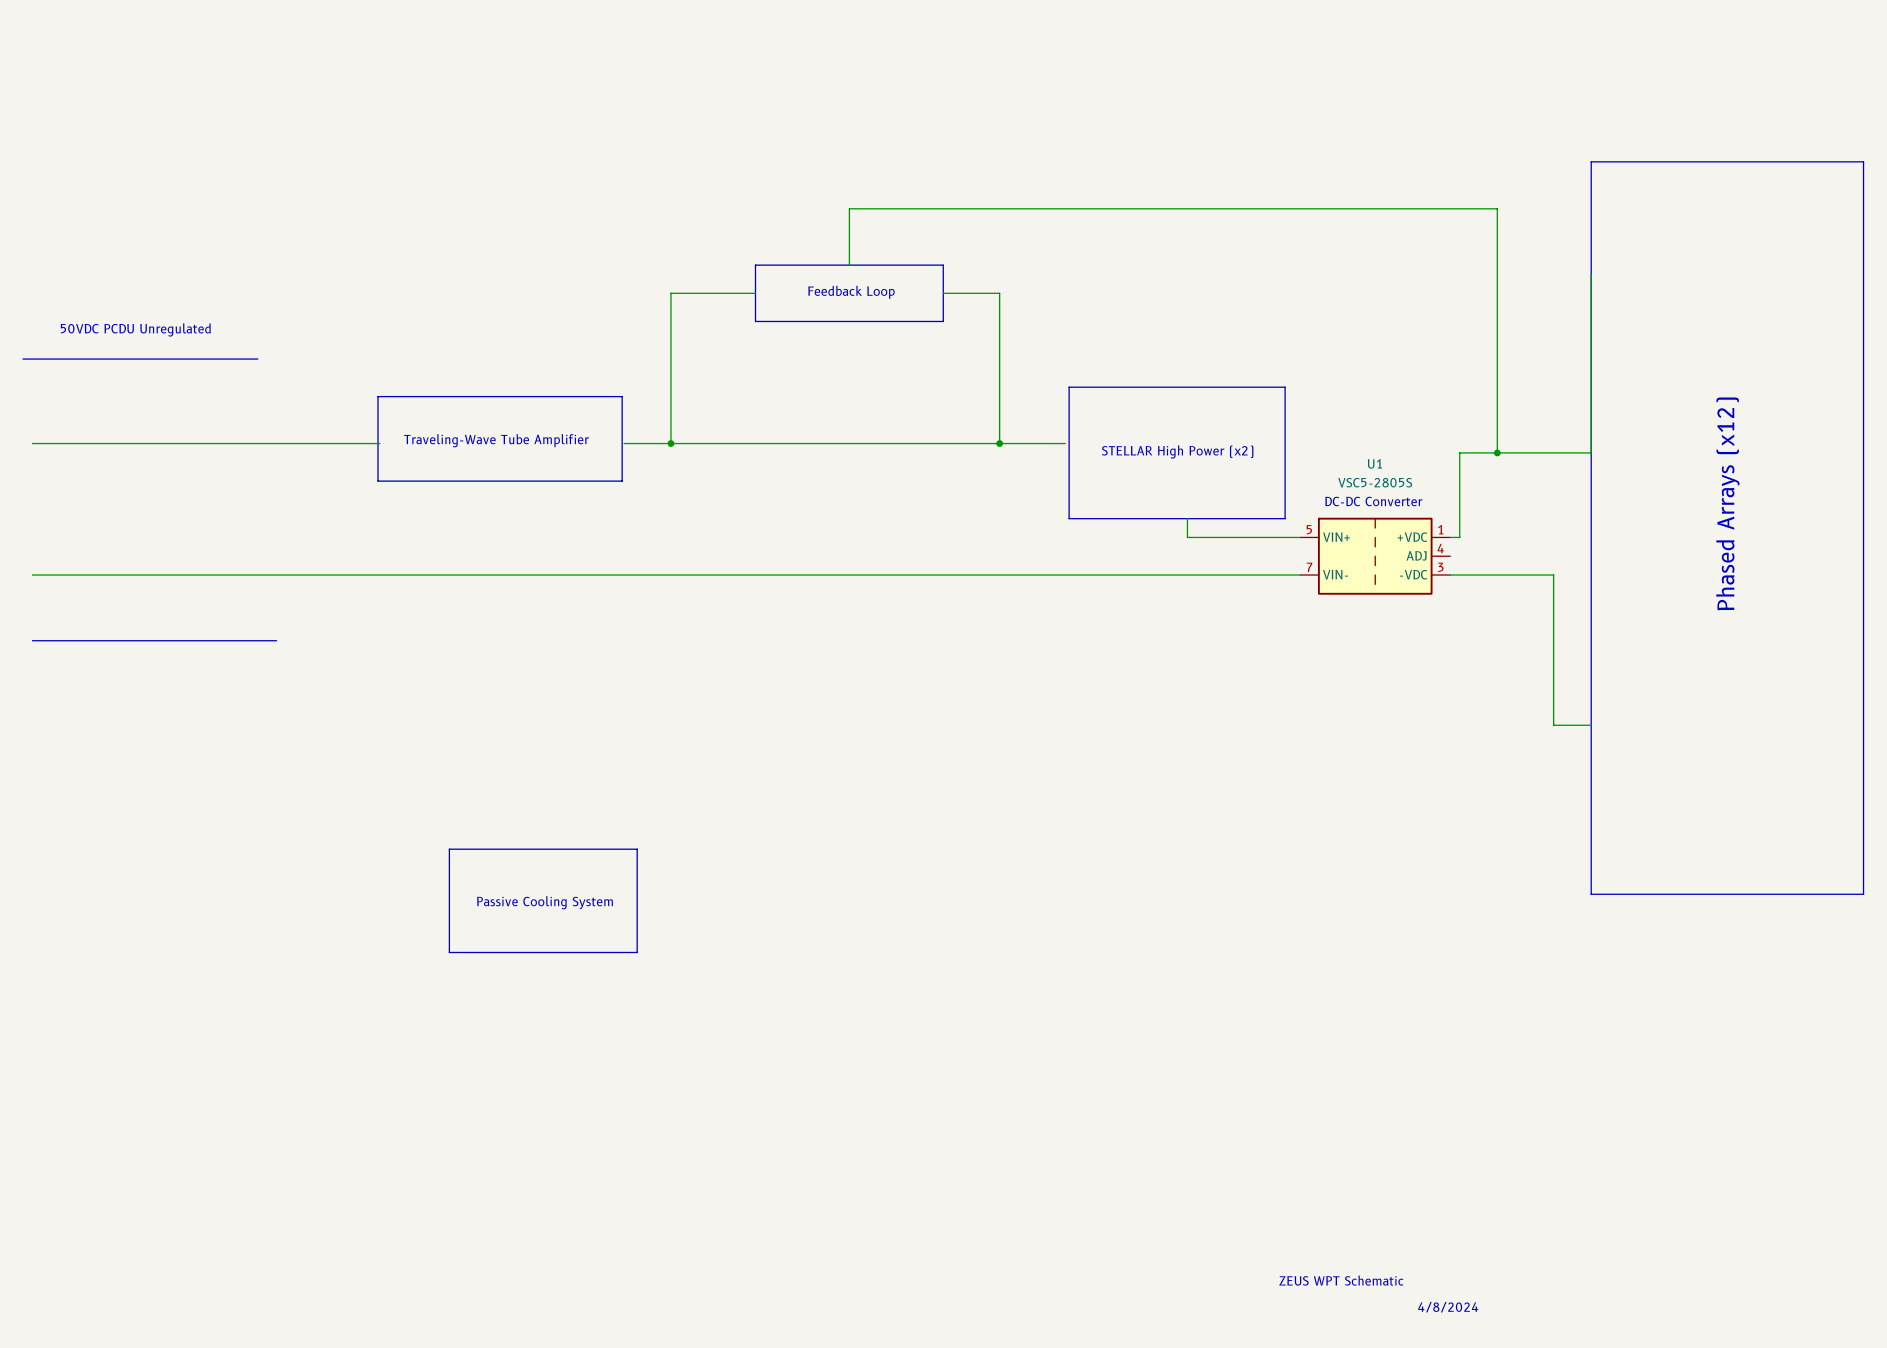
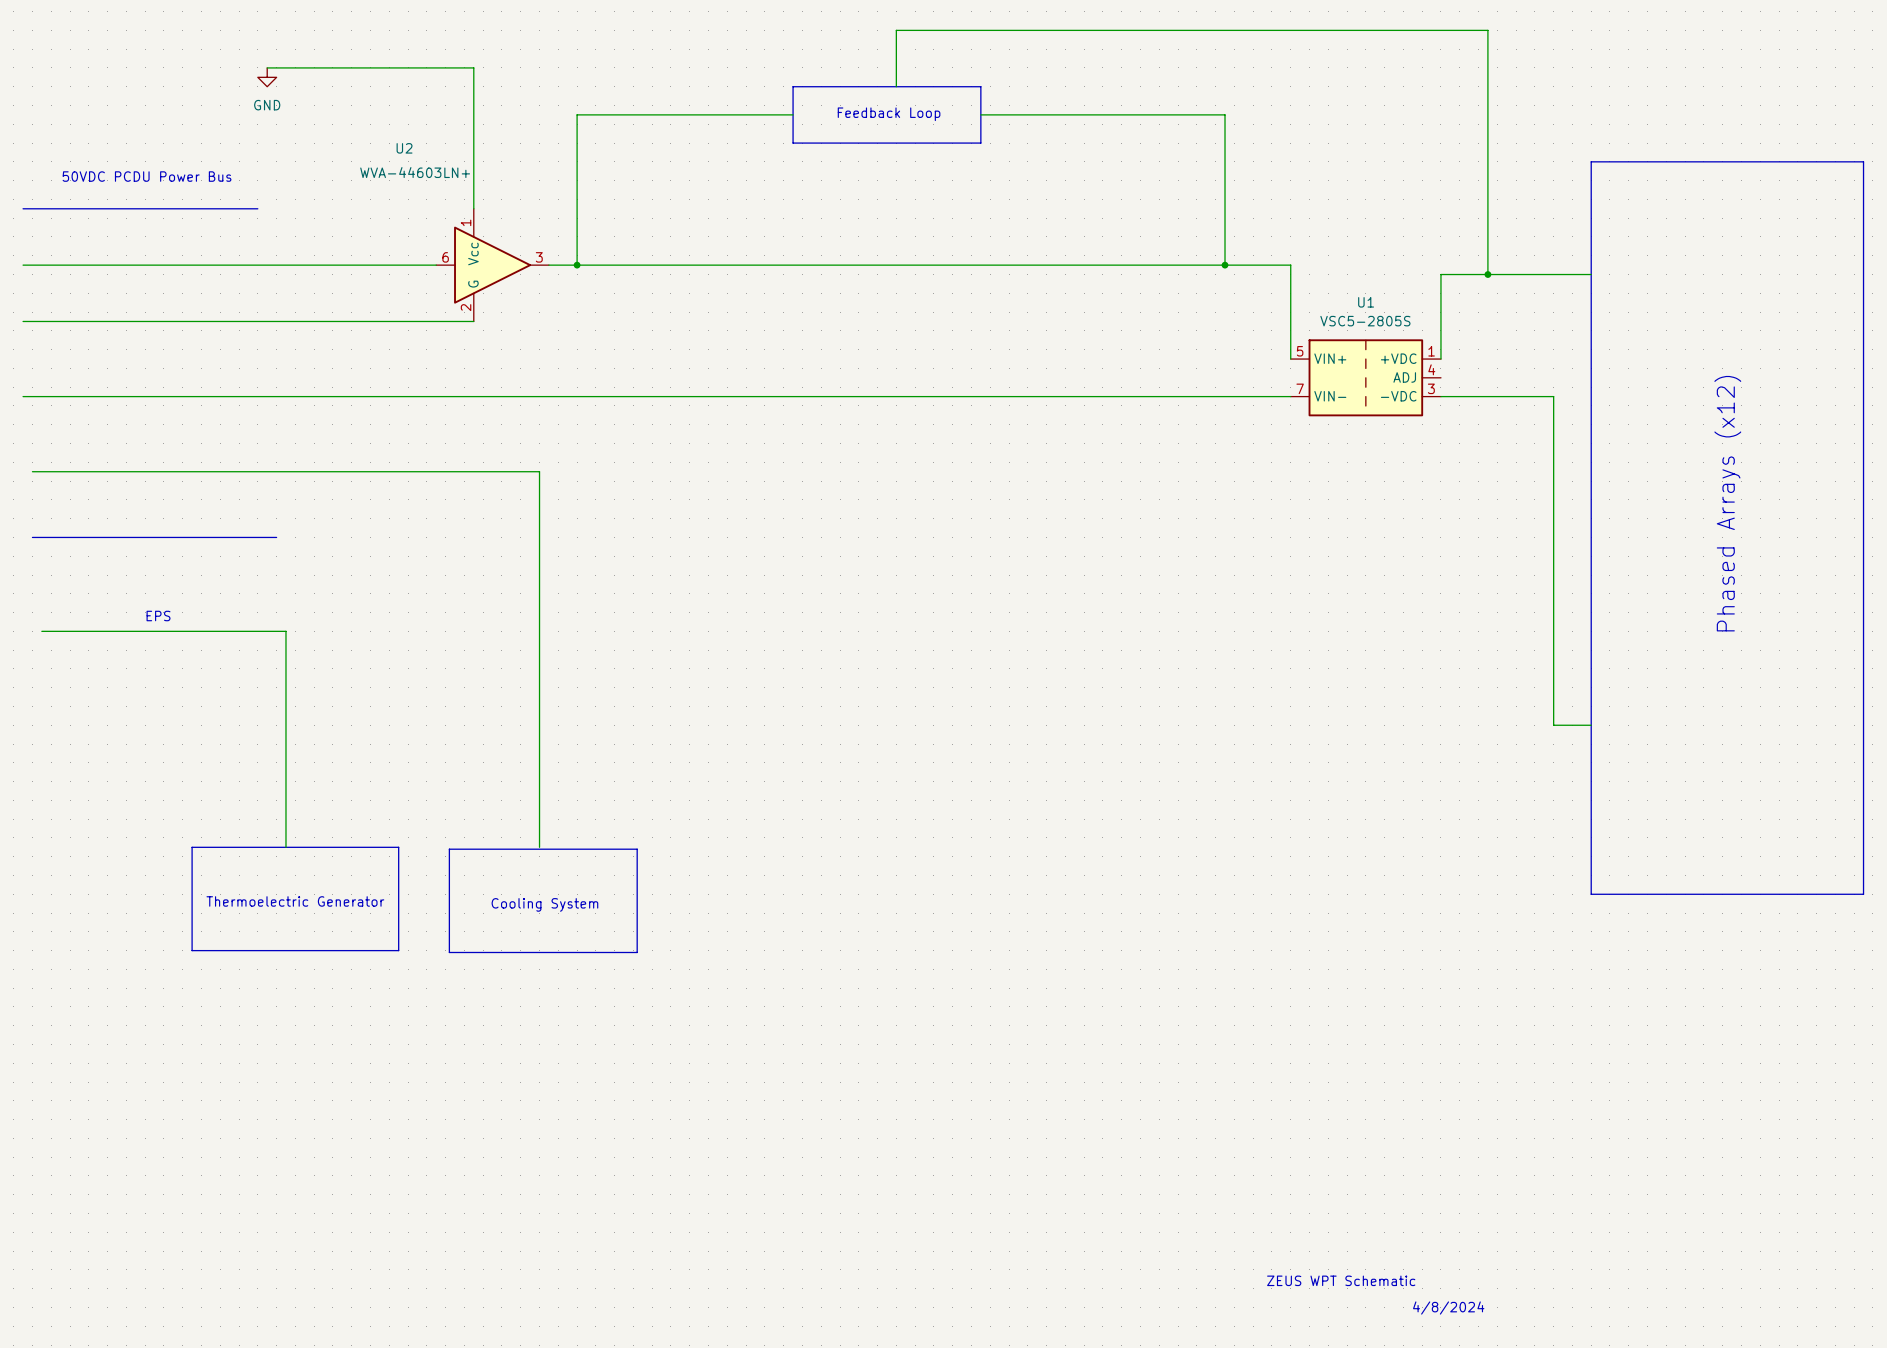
wire: none -> (267, 67) (473, 67) (473, 208)
power symbol: none -> GND (267, 77)
wire: none -> (896, 86) (896, 30) (1487, 30) (1487, 274)
wire: none -> (793, 114) (577, 114) (577, 265)
wire: none -> (980, 114) (1225, 114) (1225, 265)
text: none -> 50VDC PCDU Power Bus (147, 176)
wire: none -> (23, 265) (436, 265)
U2: none -> WVA-44603LN+ (492, 265)
wire: none -> (548, 265) (1290, 265) (1290, 359)
junction: none -> (577, 265)
line: (755, 265) (943, 265) (943, 321) (755, 321) (755, 265) -> (793, 86) (980, 86) (980, 143) (793, 143) (793, 86)
wire: (849, 265) (849, 208) (1497, 208) (1497, 452) -> none
junction: none -> (1225, 265)
junction: none -> (1487, 274)
wire: (1591, 274) (1591, 452) (1459, 452) (1459, 537) (1450, 537) -> (1591, 274) (1440, 274) (1440, 359)
text position: Feedback Loop (851, 292) -> Feedback Loop (889, 114)
wire: (755, 293) (670, 293) (670, 443) -> none
wire: (943, 293) (999, 293) (999, 443) -> none
wire: none -> (23, 321) (473, 321)
text: 50VDC PCDU Unregulated (135, 329) -> none
bus: (23, 359) (257, 359) -> (23, 208) (257, 208)
line: (1069, 387) (1285, 387) (1285, 518) (1069, 518) (1069, 387) -> none
line: (378, 396) (622, 396) (622, 481) (378, 481) (378, 396) -> none
text: Traveling-Wave Tube Amplifier (496, 440) -> none
wire: (32, 443) (379, 443) -> none
wire: (624, 443) (1065, 443) -> none
junction: (670, 443) -> none
junction: (999, 443) -> none
text: STELLAR High Power (x2) (1177, 452) -> none
junction: (1497, 452) -> none
U1 name position: U1 (1374, 463) -> U1 (1366, 302)
wire: none -> (32, 471) (539, 471) (539, 847)
U1 value position: VSC5-2805S (1375, 482) -> VSC5-2805S (1365, 321)
text: DC-DC Converter (1373, 501) -> none
wire: (1187, 518) (1187, 537) (1300, 537) -> none
U1 position: (1375, 556) -> (1365, 377)
wire: (32, 575) (1300, 575) -> (23, 396) (1290, 396)
wire: (1450, 575) (1553, 575) -> (1440, 396) (1553, 396) (1553, 575)
text: none -> EPS (158, 616)
wire: none -> (41, 631) (285, 631) (285, 847)
bus: (32, 640) (276, 640) -> (32, 537) (276, 537)
line: none -> (192, 847) (398, 847) (398, 950) (192, 950) (192, 847)
text: none -> Thermoelectric Generator (295, 901)
text: Passive Cooling System (544, 902) -> Cooling System (544, 904)

